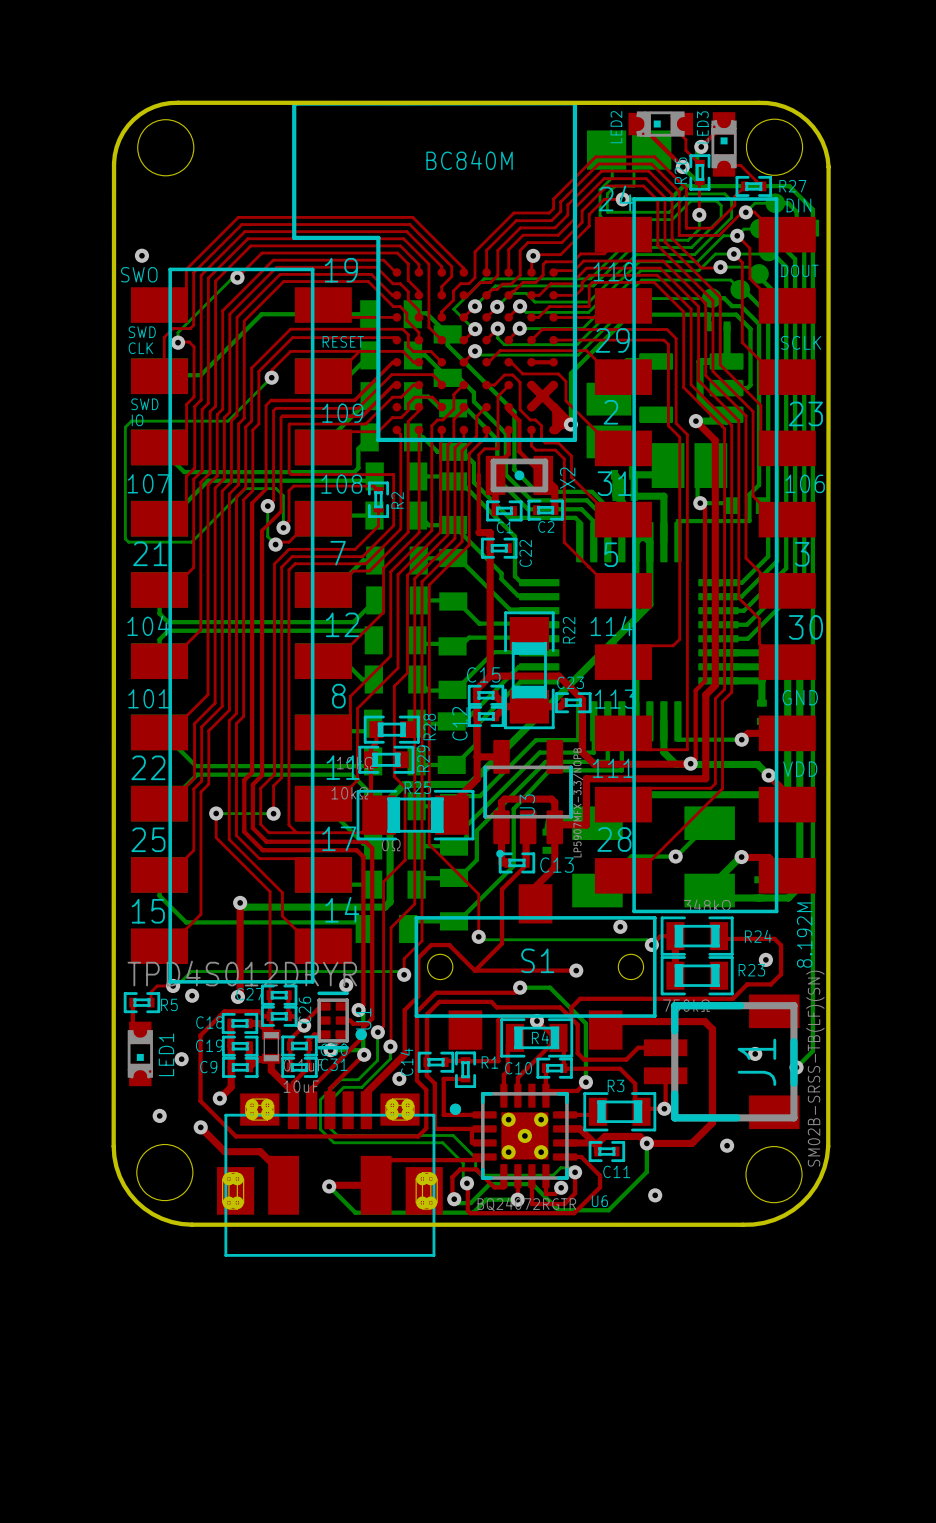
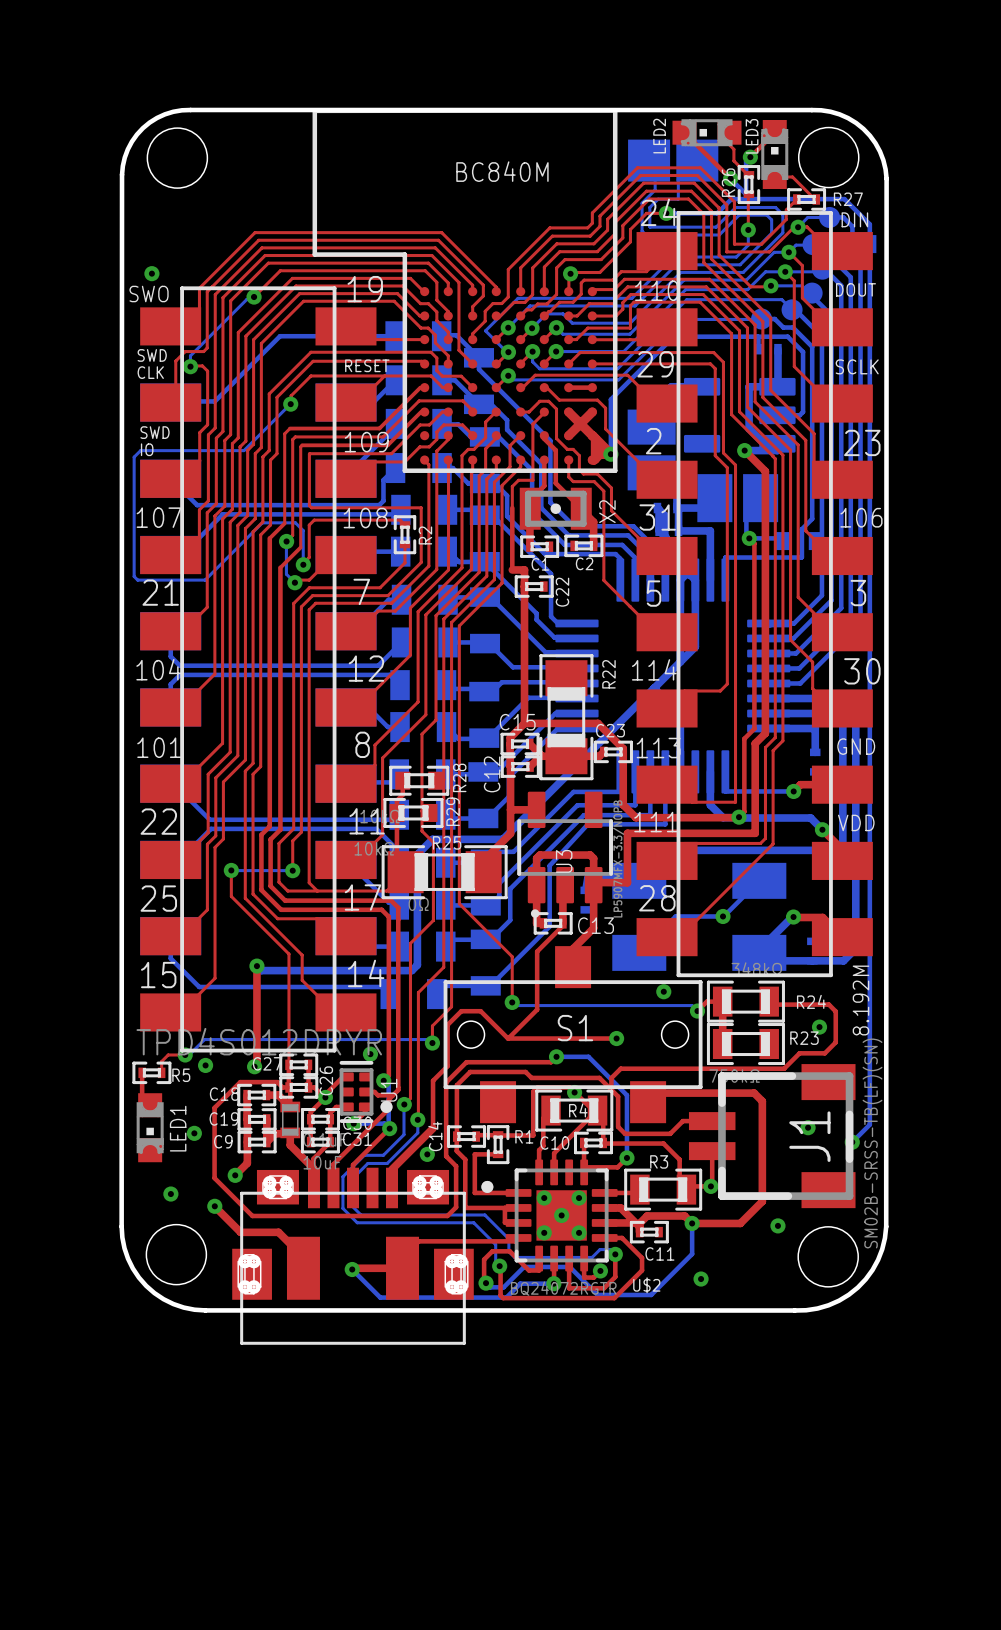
U6 name: U6 (599, 1201) -> U$2 (646, 1285)

